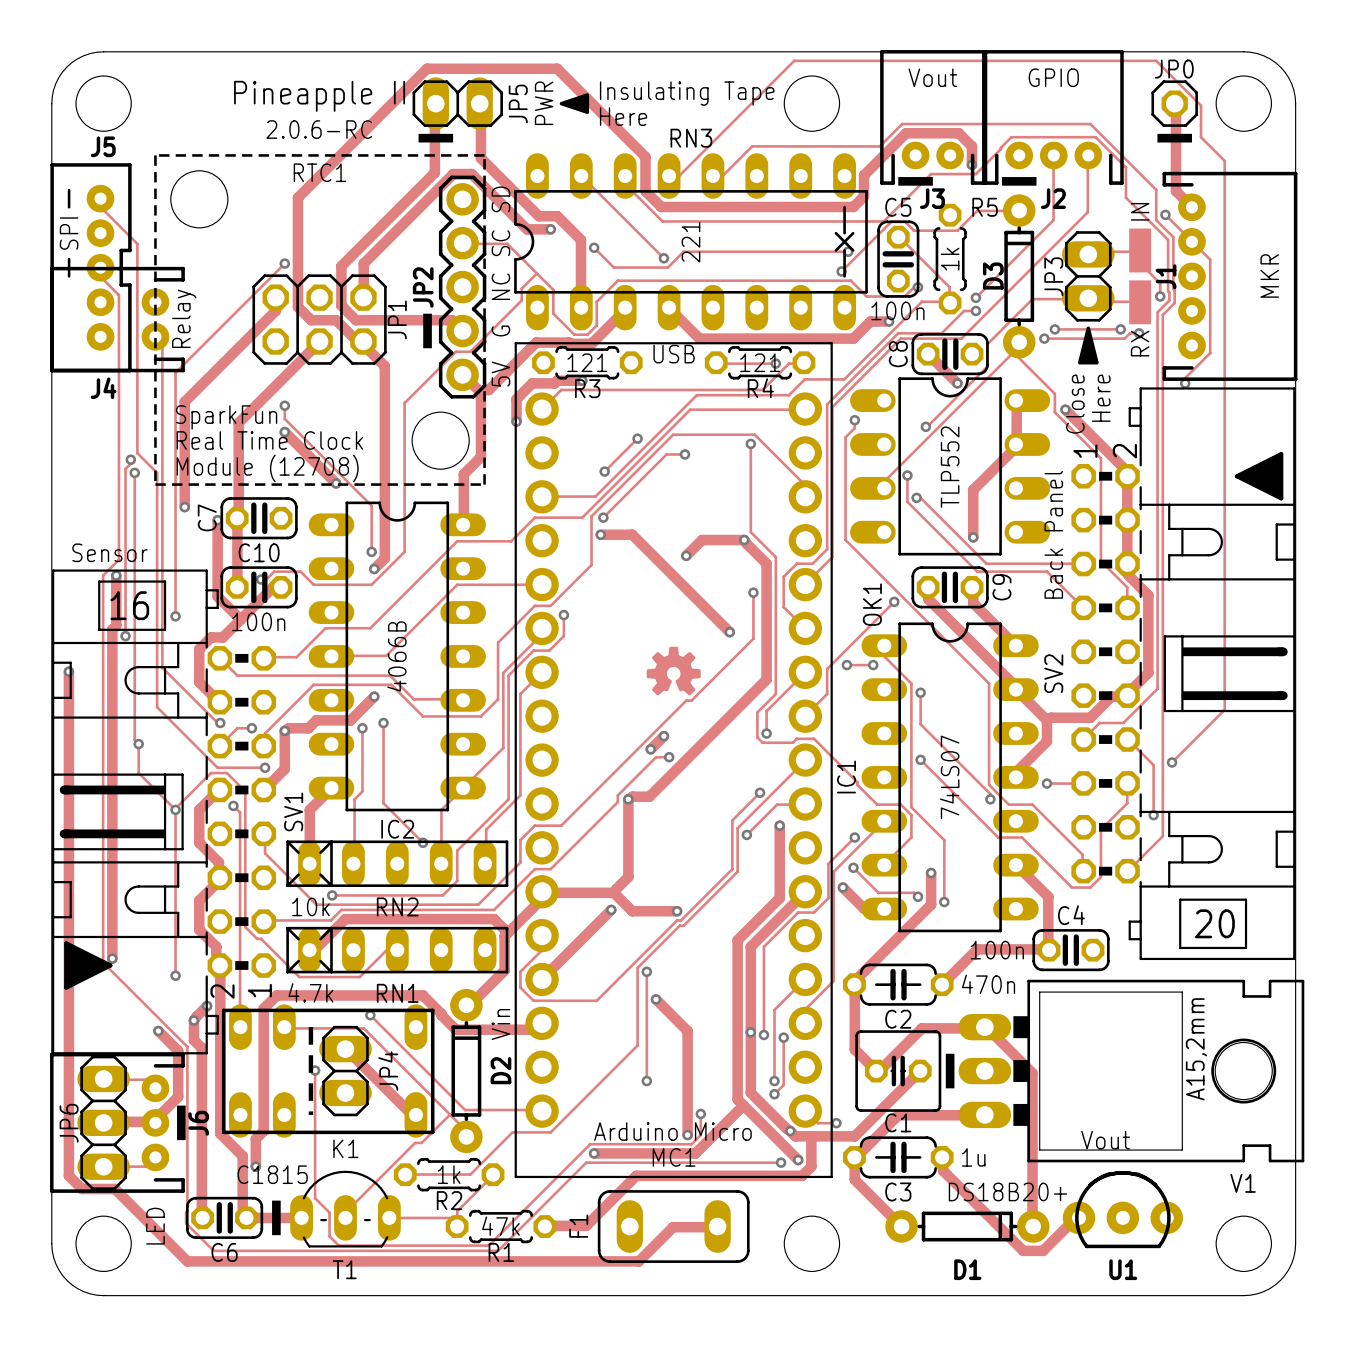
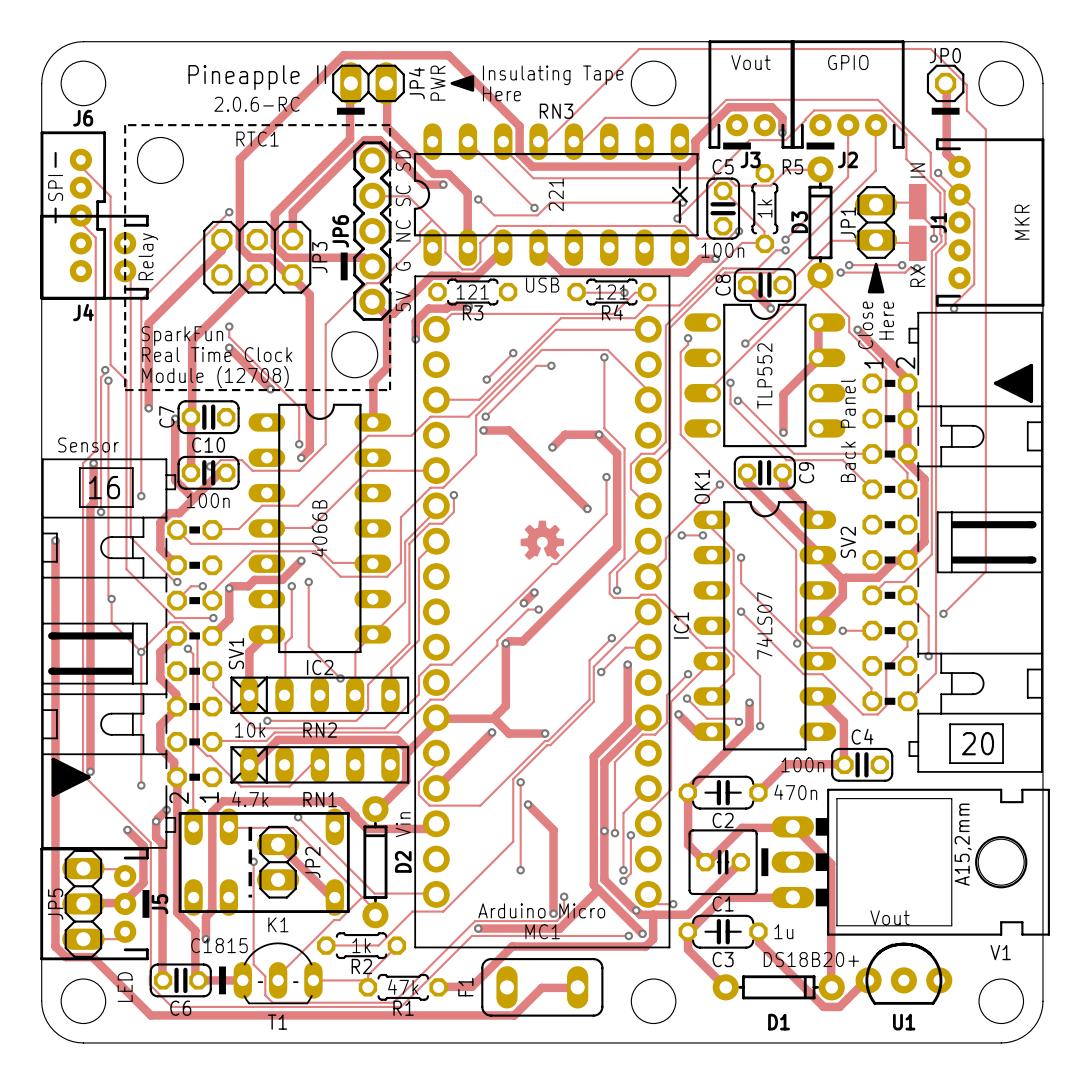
JP5 name: JP5 (518, 104) -> JP4 (416, 83)
J5 name: J5 (103, 146) -> J6 (83, 118)
JP3 name: JP3 (1053, 276) -> JP1 (848, 222)
JP2 name: JP2 (423, 287) -> JP6 (340, 231)
JP1 name: JP1 (397, 319) -> JP3 (319, 257)
JP4 name: JP4 (388, 1071) -> JP2 (312, 862)
JP6 name: JP6 (69, 1123) -> JP5 (55, 904)
J6 name: J6 (198, 1123) -> J5 (159, 904)

